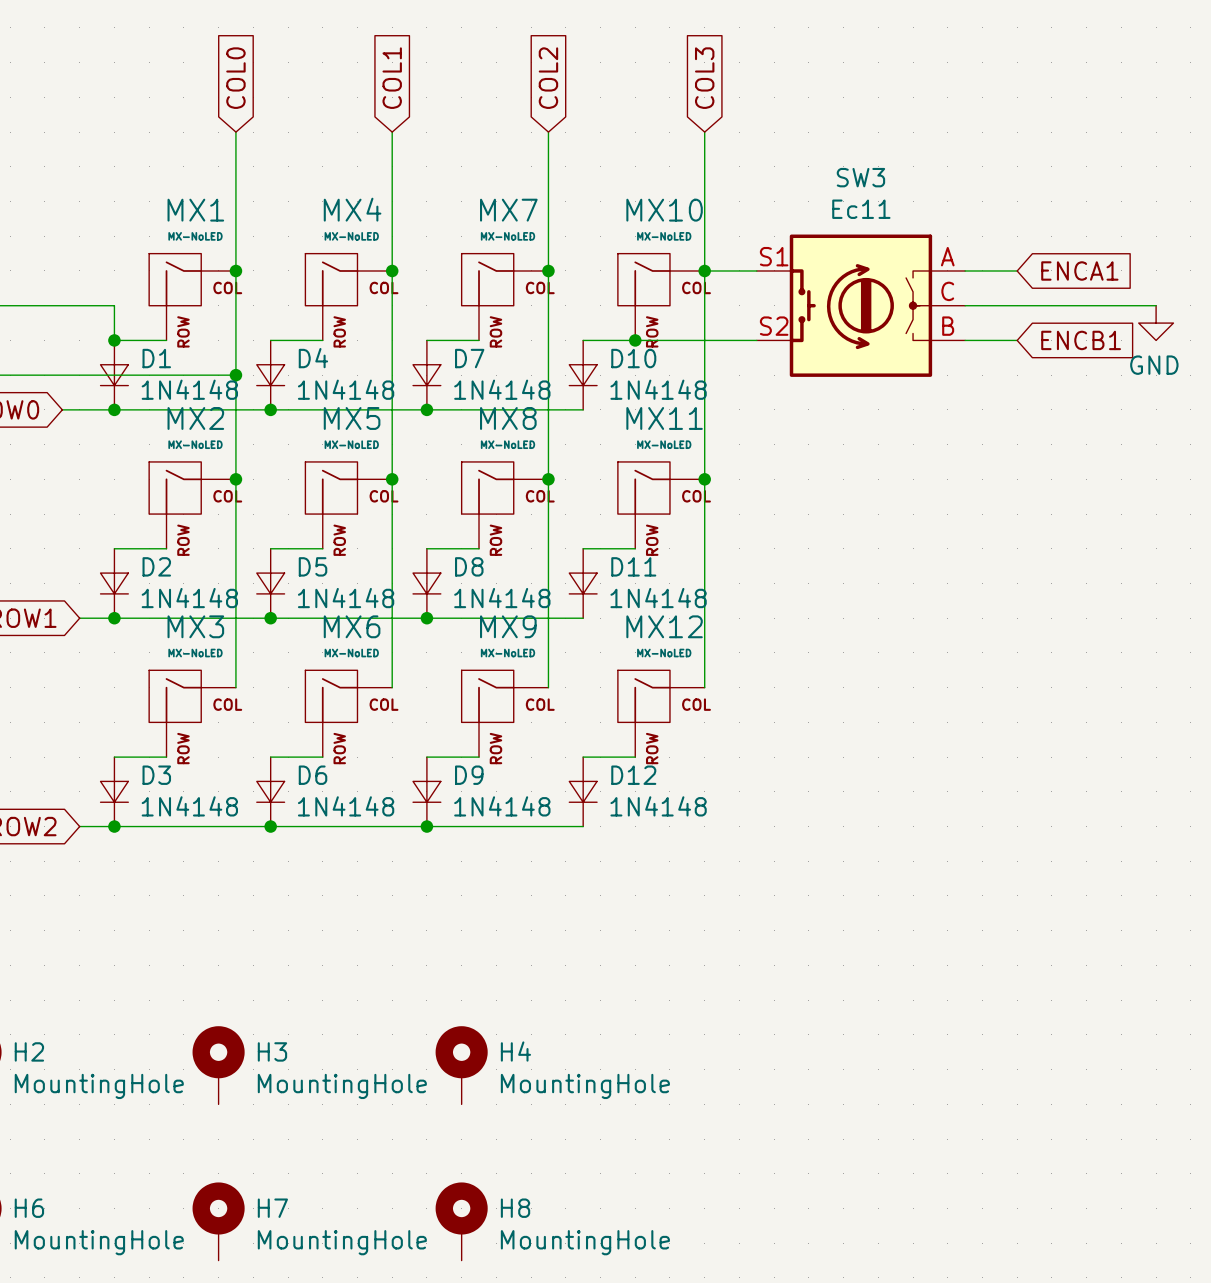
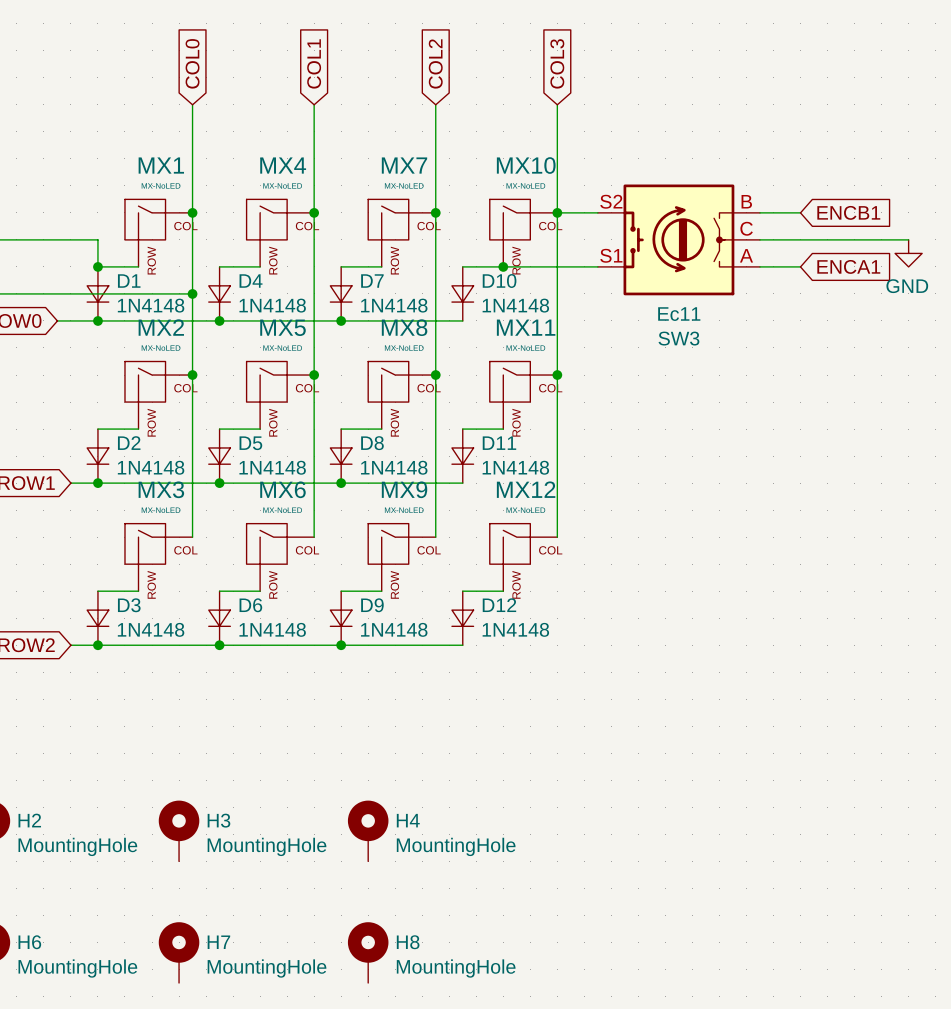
global label: ENCA1 (1079, 270) -> ENCB1 (848, 212)
SW3 flip: as is (860, 305) -> up-down (678, 239)
global label: ENCB1 (1081, 340) -> ENCA1 (848, 266)

